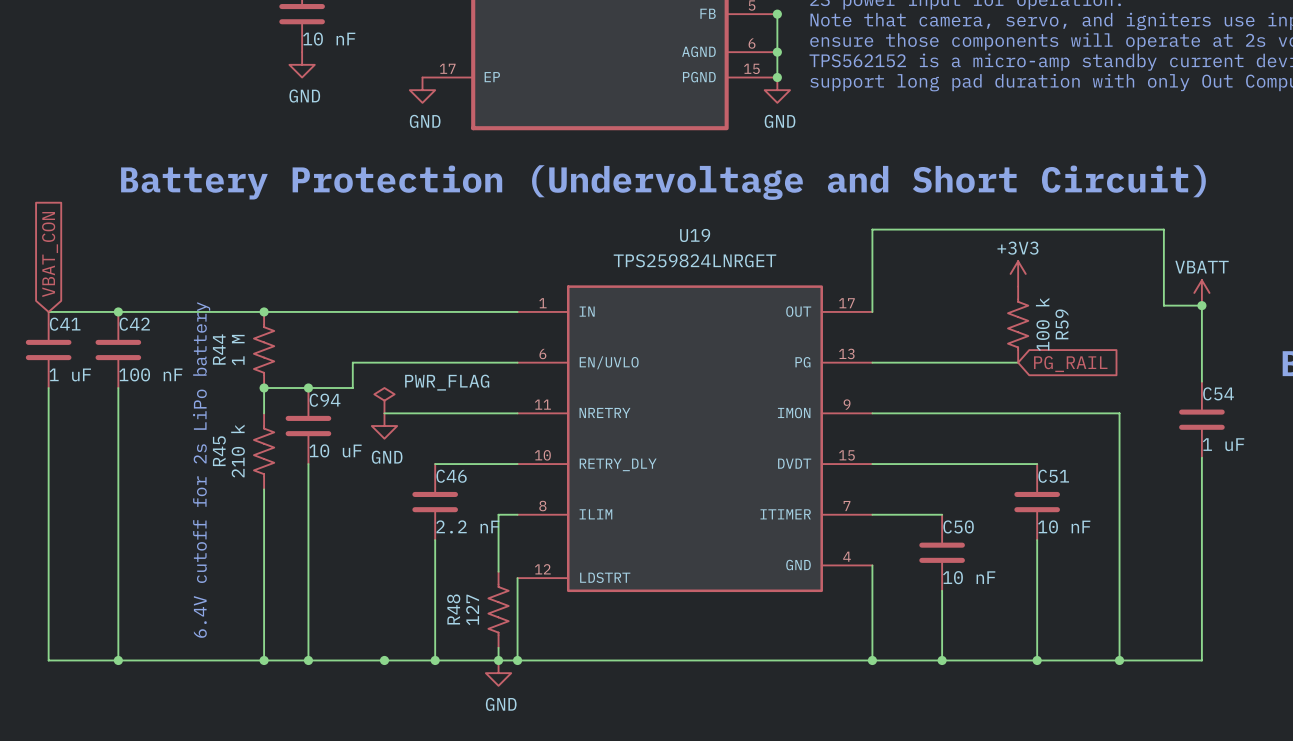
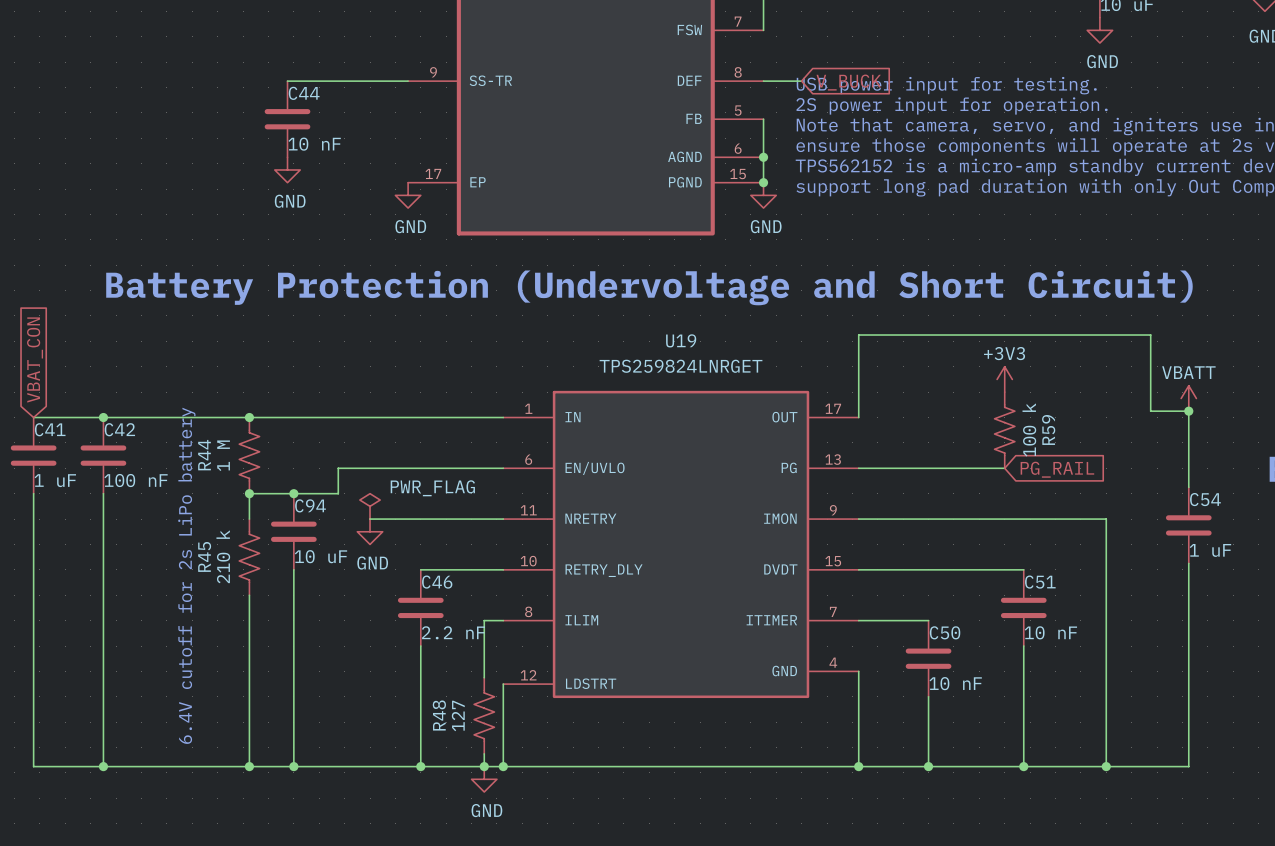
junction: (777, 14) -> none
junction: (384, 660) -> none

